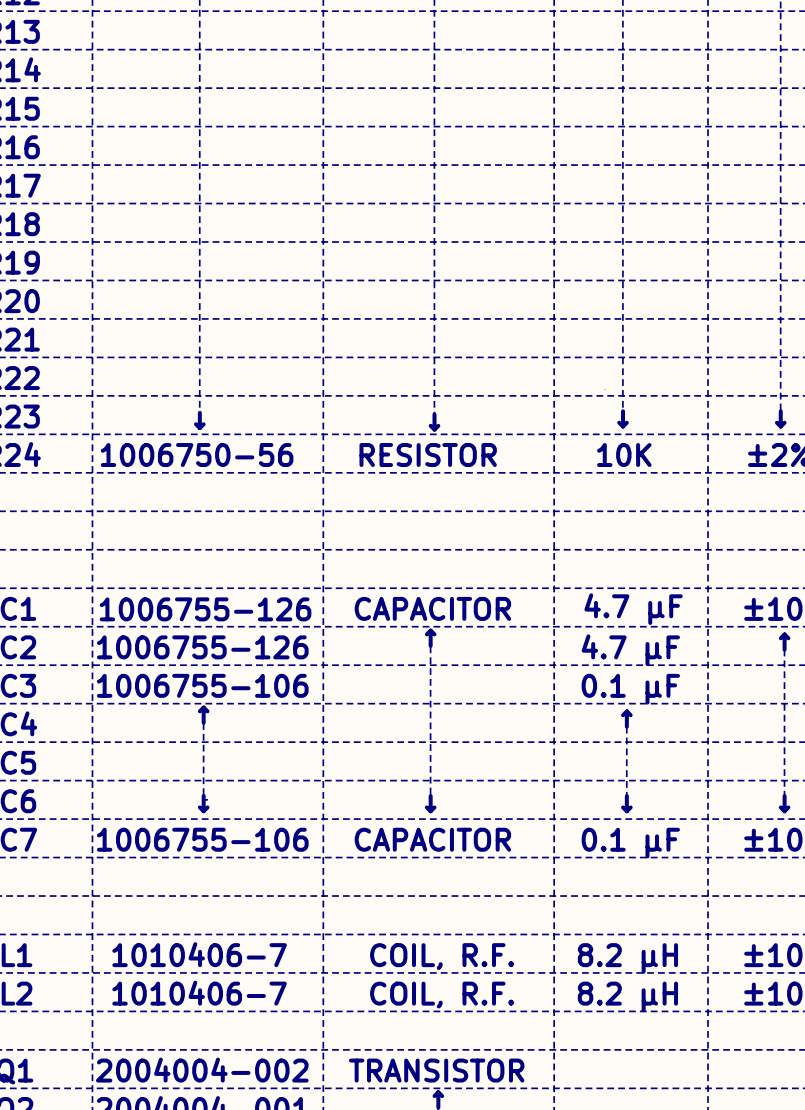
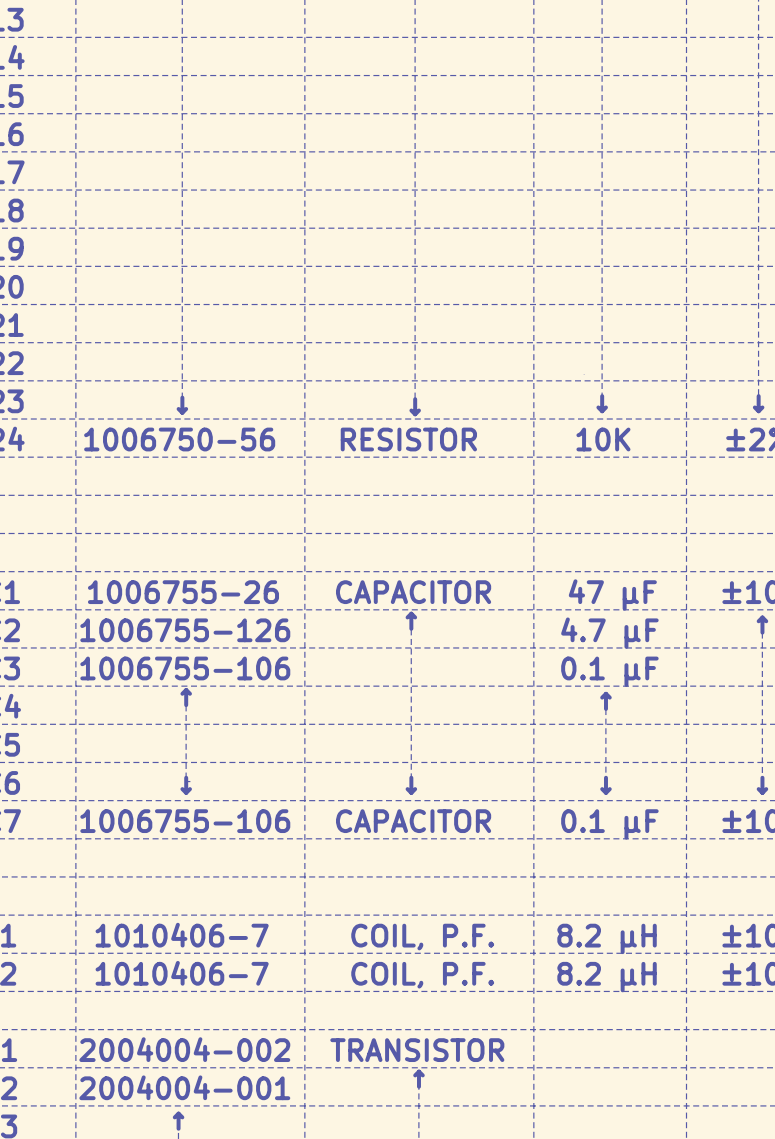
text: 1006755-126 (205, 609) -> 1006755-26 (183, 592)
text: 4.7 μF (633, 609) -> 47 μF (612, 594)
text: COIL, R.F. (442, 956) -> COIL, P.F. (422, 937)
text: COIL, R.F. (442, 995) -> COIL, P.F. (422, 975)

